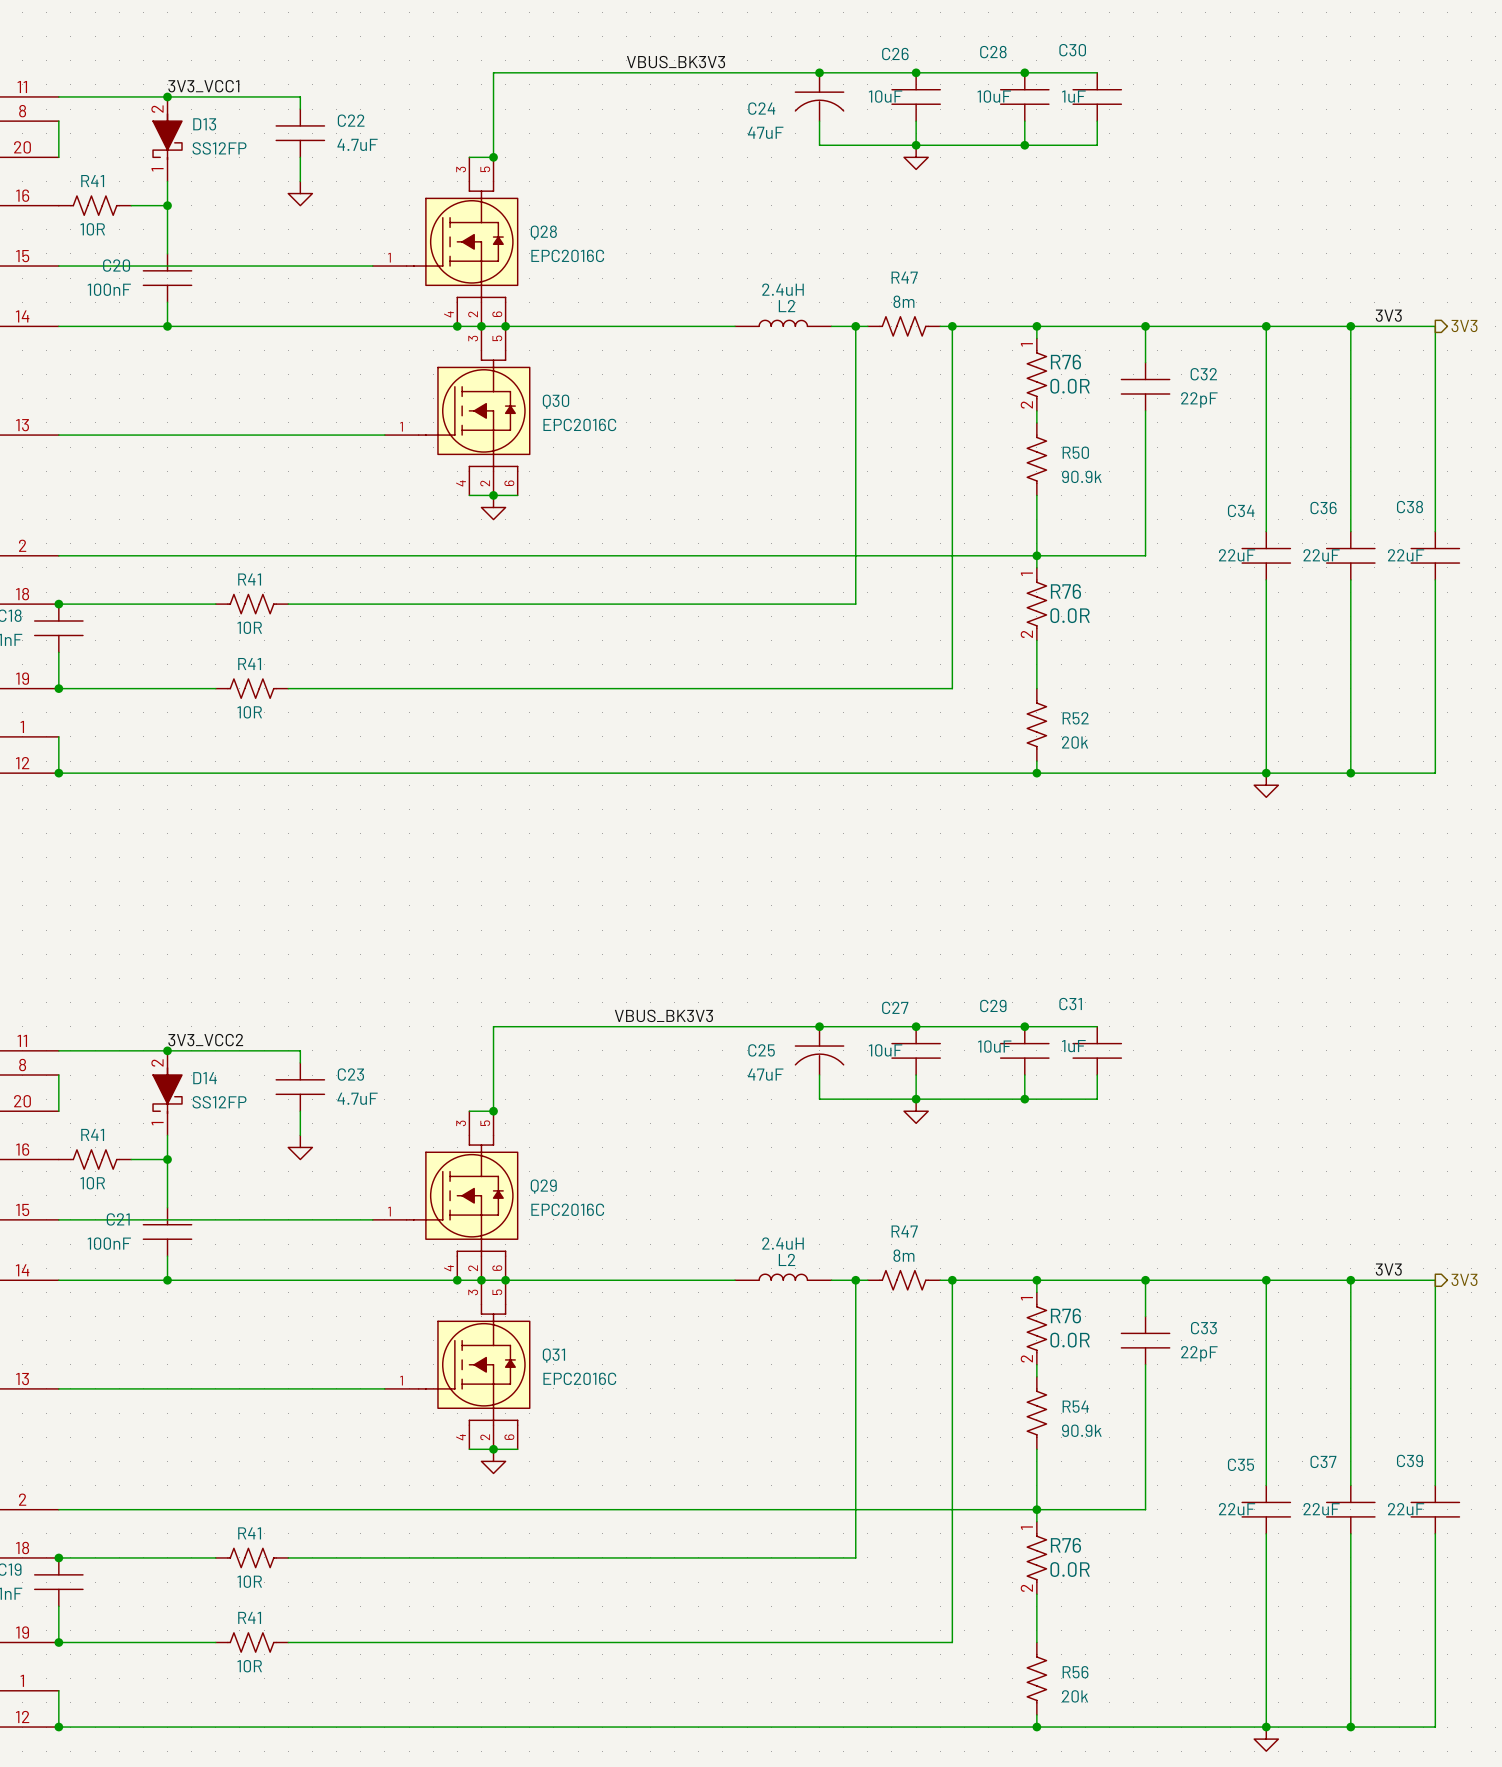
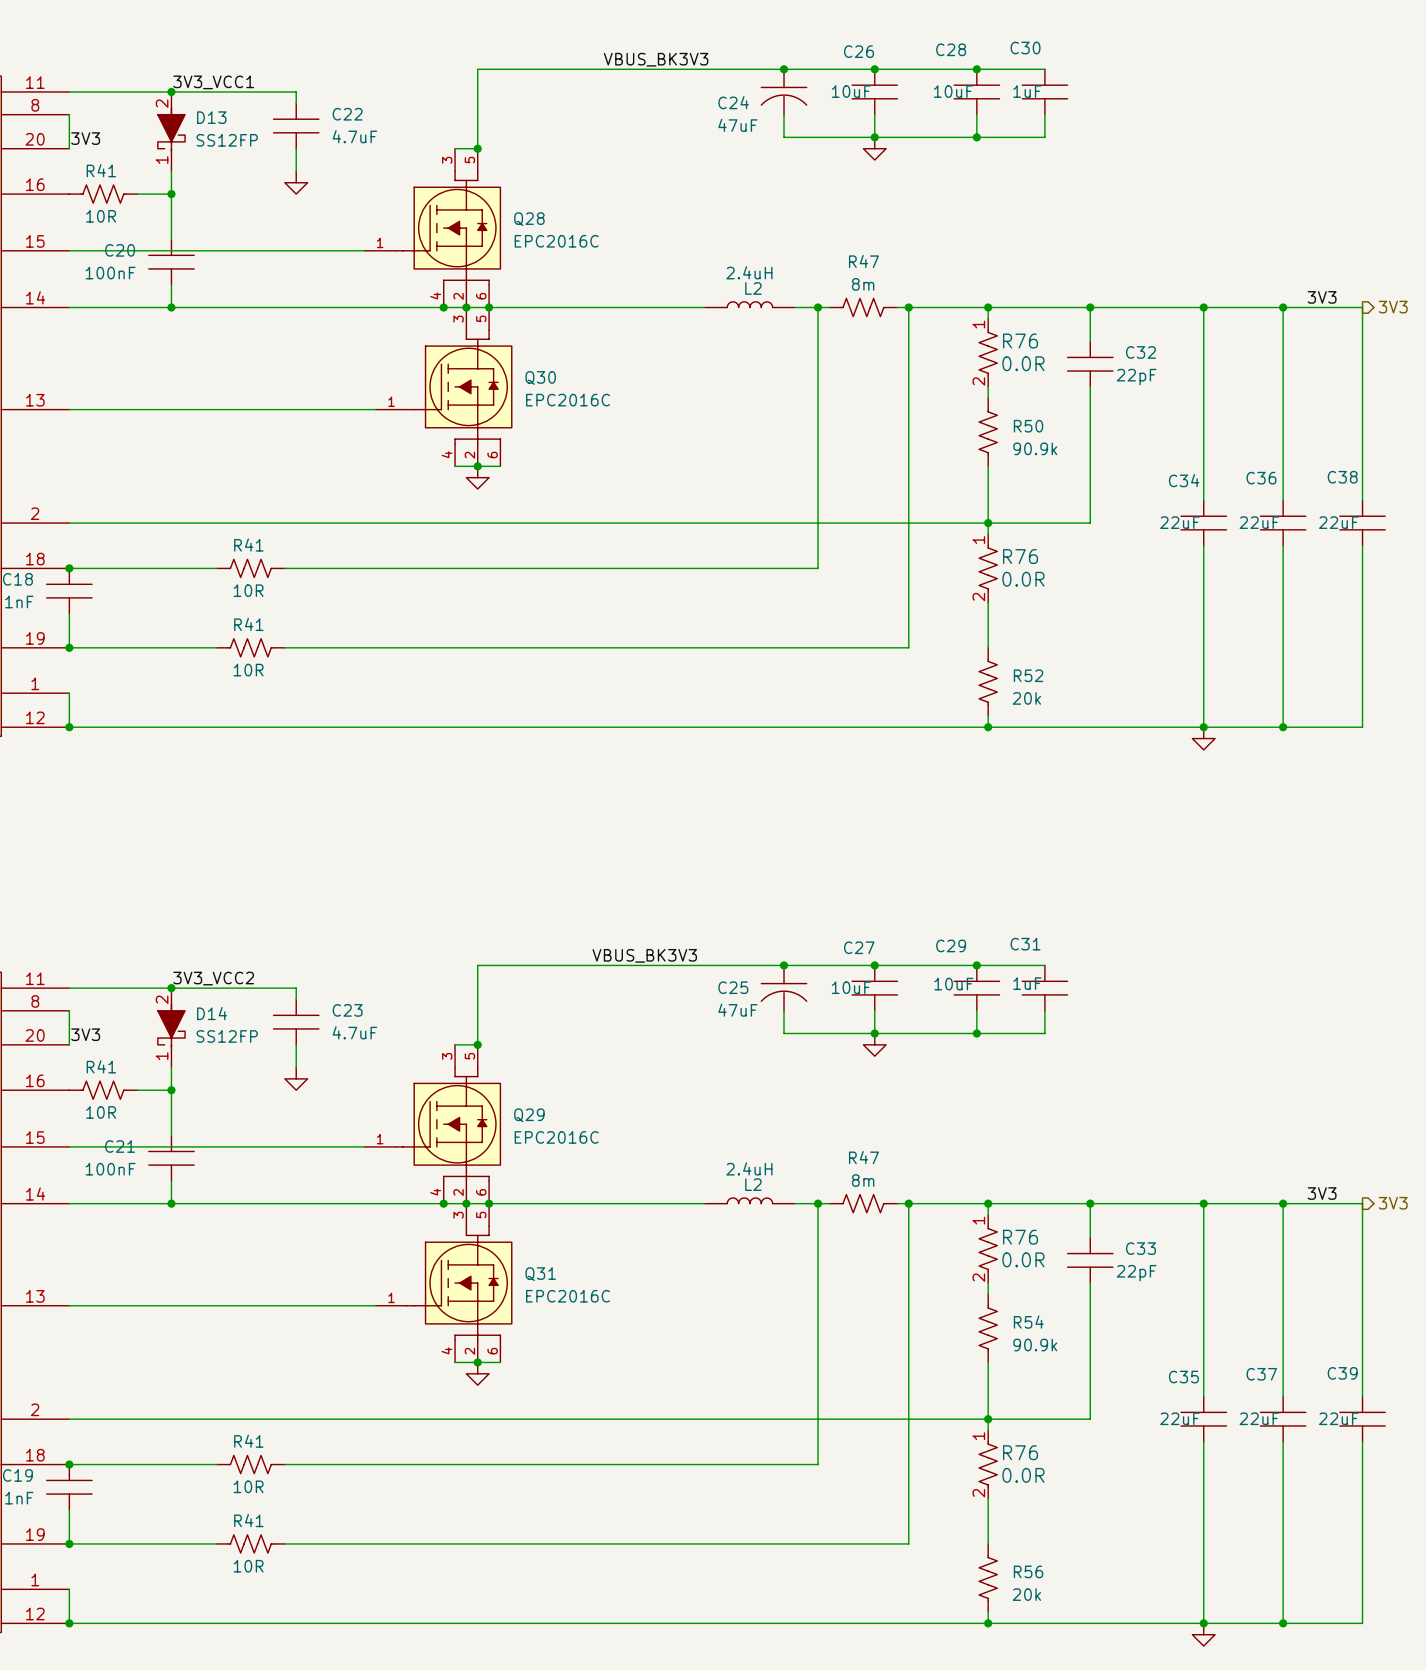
label: none -> 3V3 (85, 138)
label: none -> 3V3 (85, 1034)

